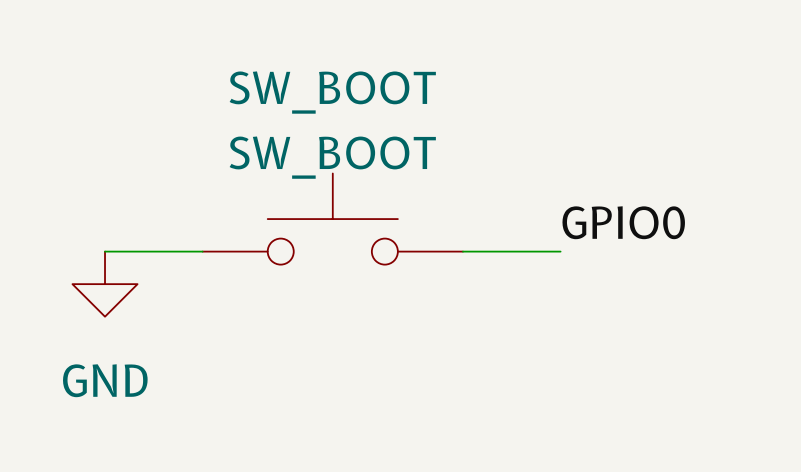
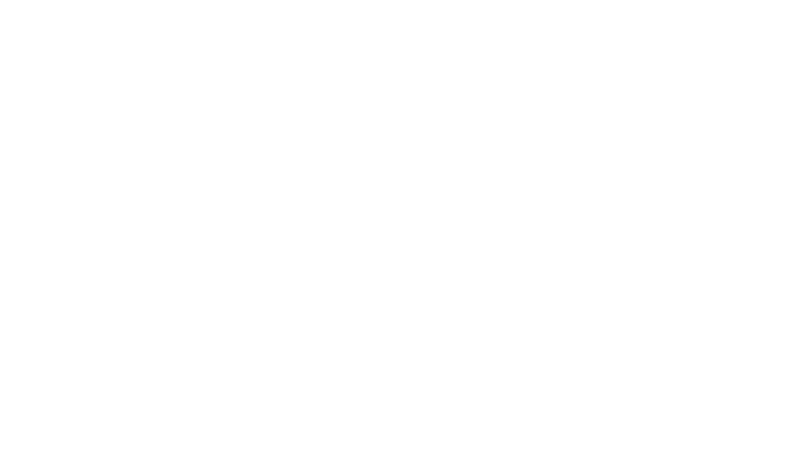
SW_BOOT: SW_BOOT (332, 219) -> none
label: GPIO0 (623, 222) -> none
wire: (105, 251) (202, 251) -> none
wire: (462, 251) (560, 251) -> none
power symbol: GND (105, 284) -> none

